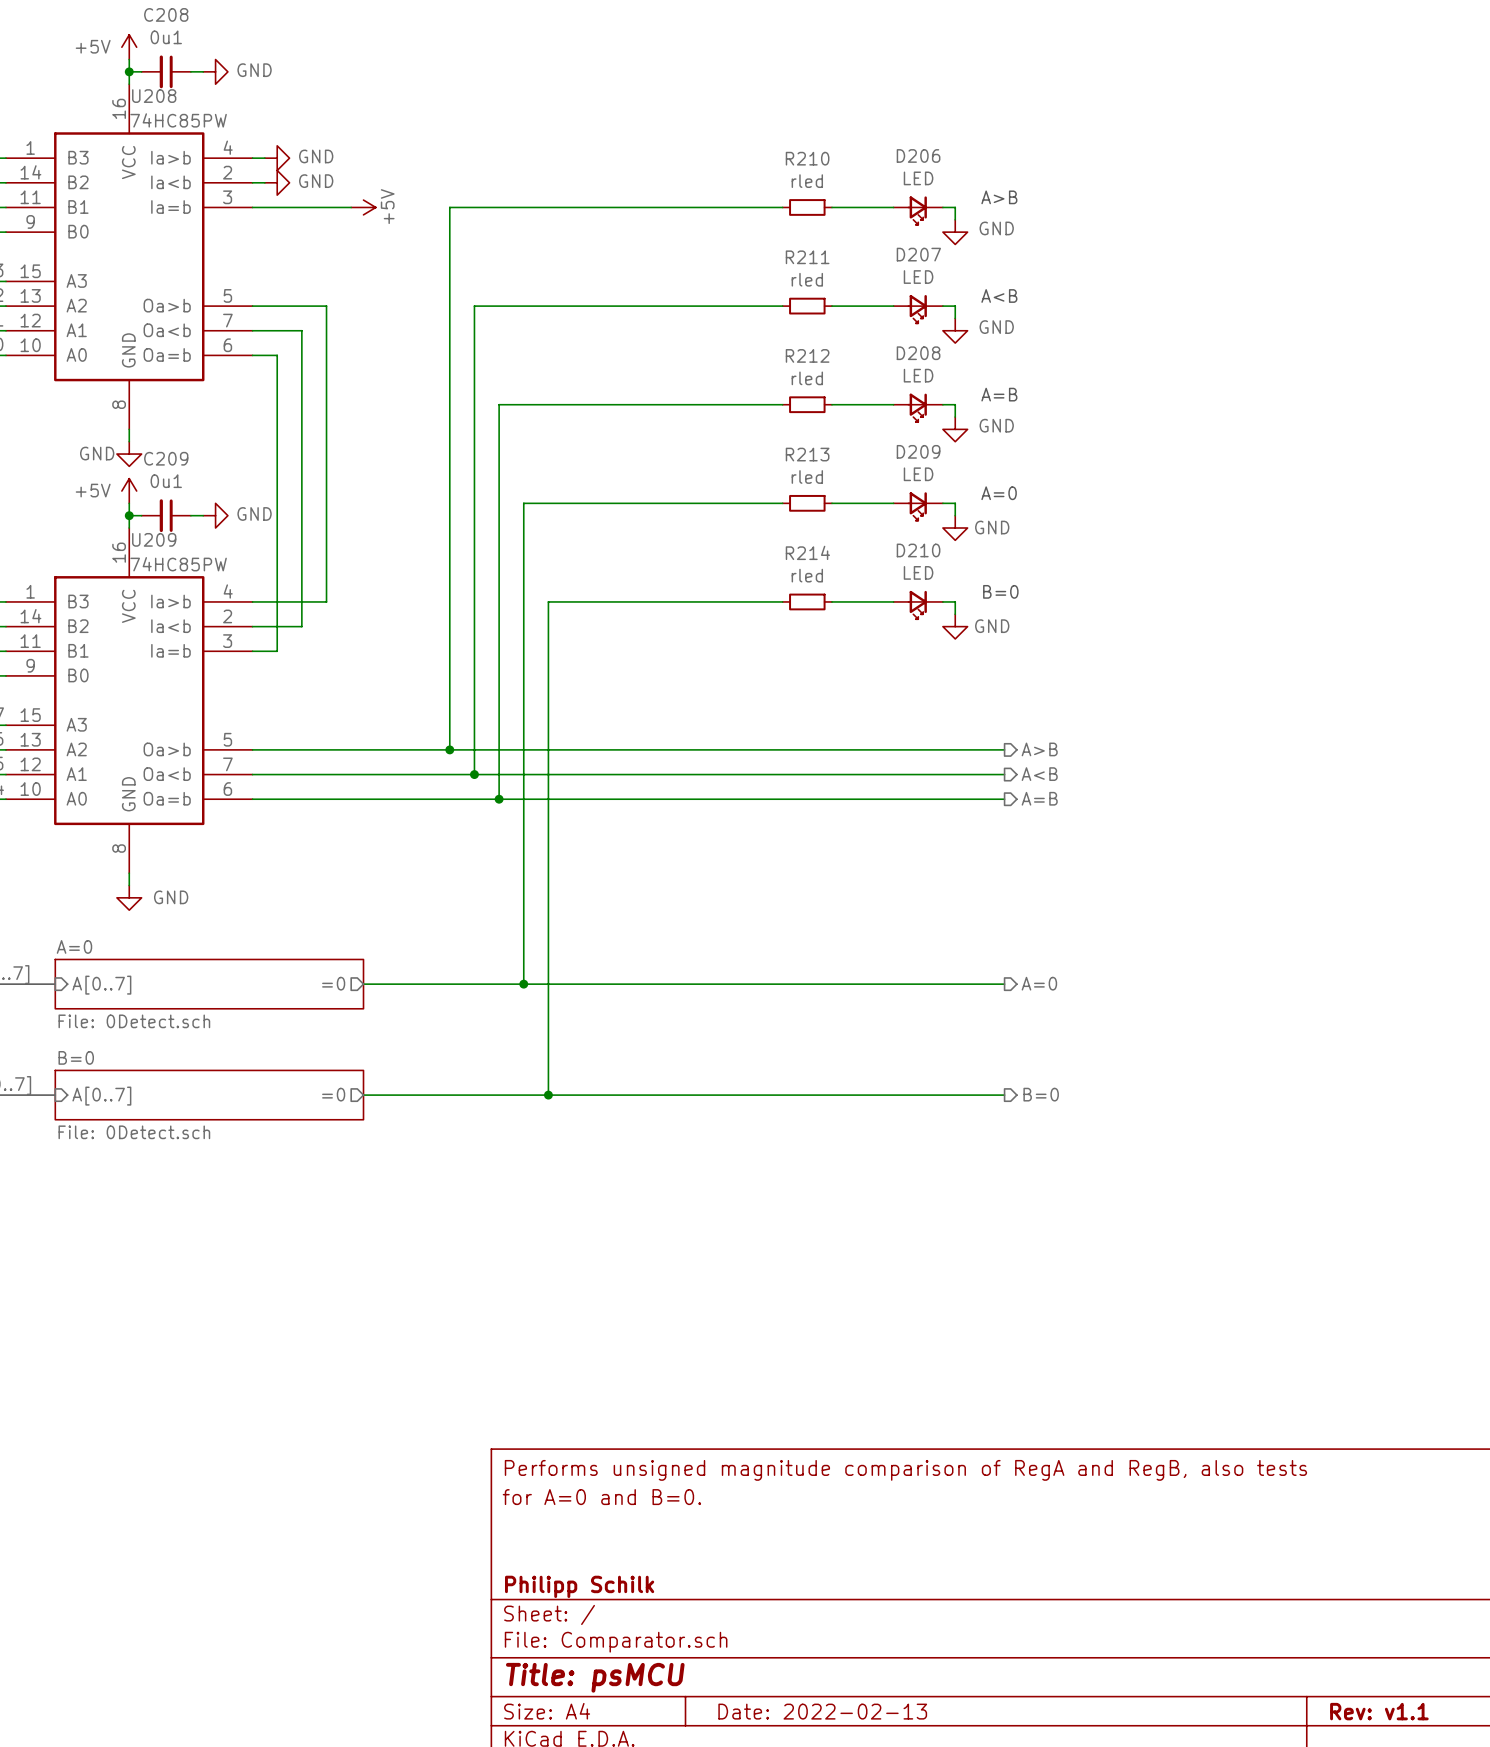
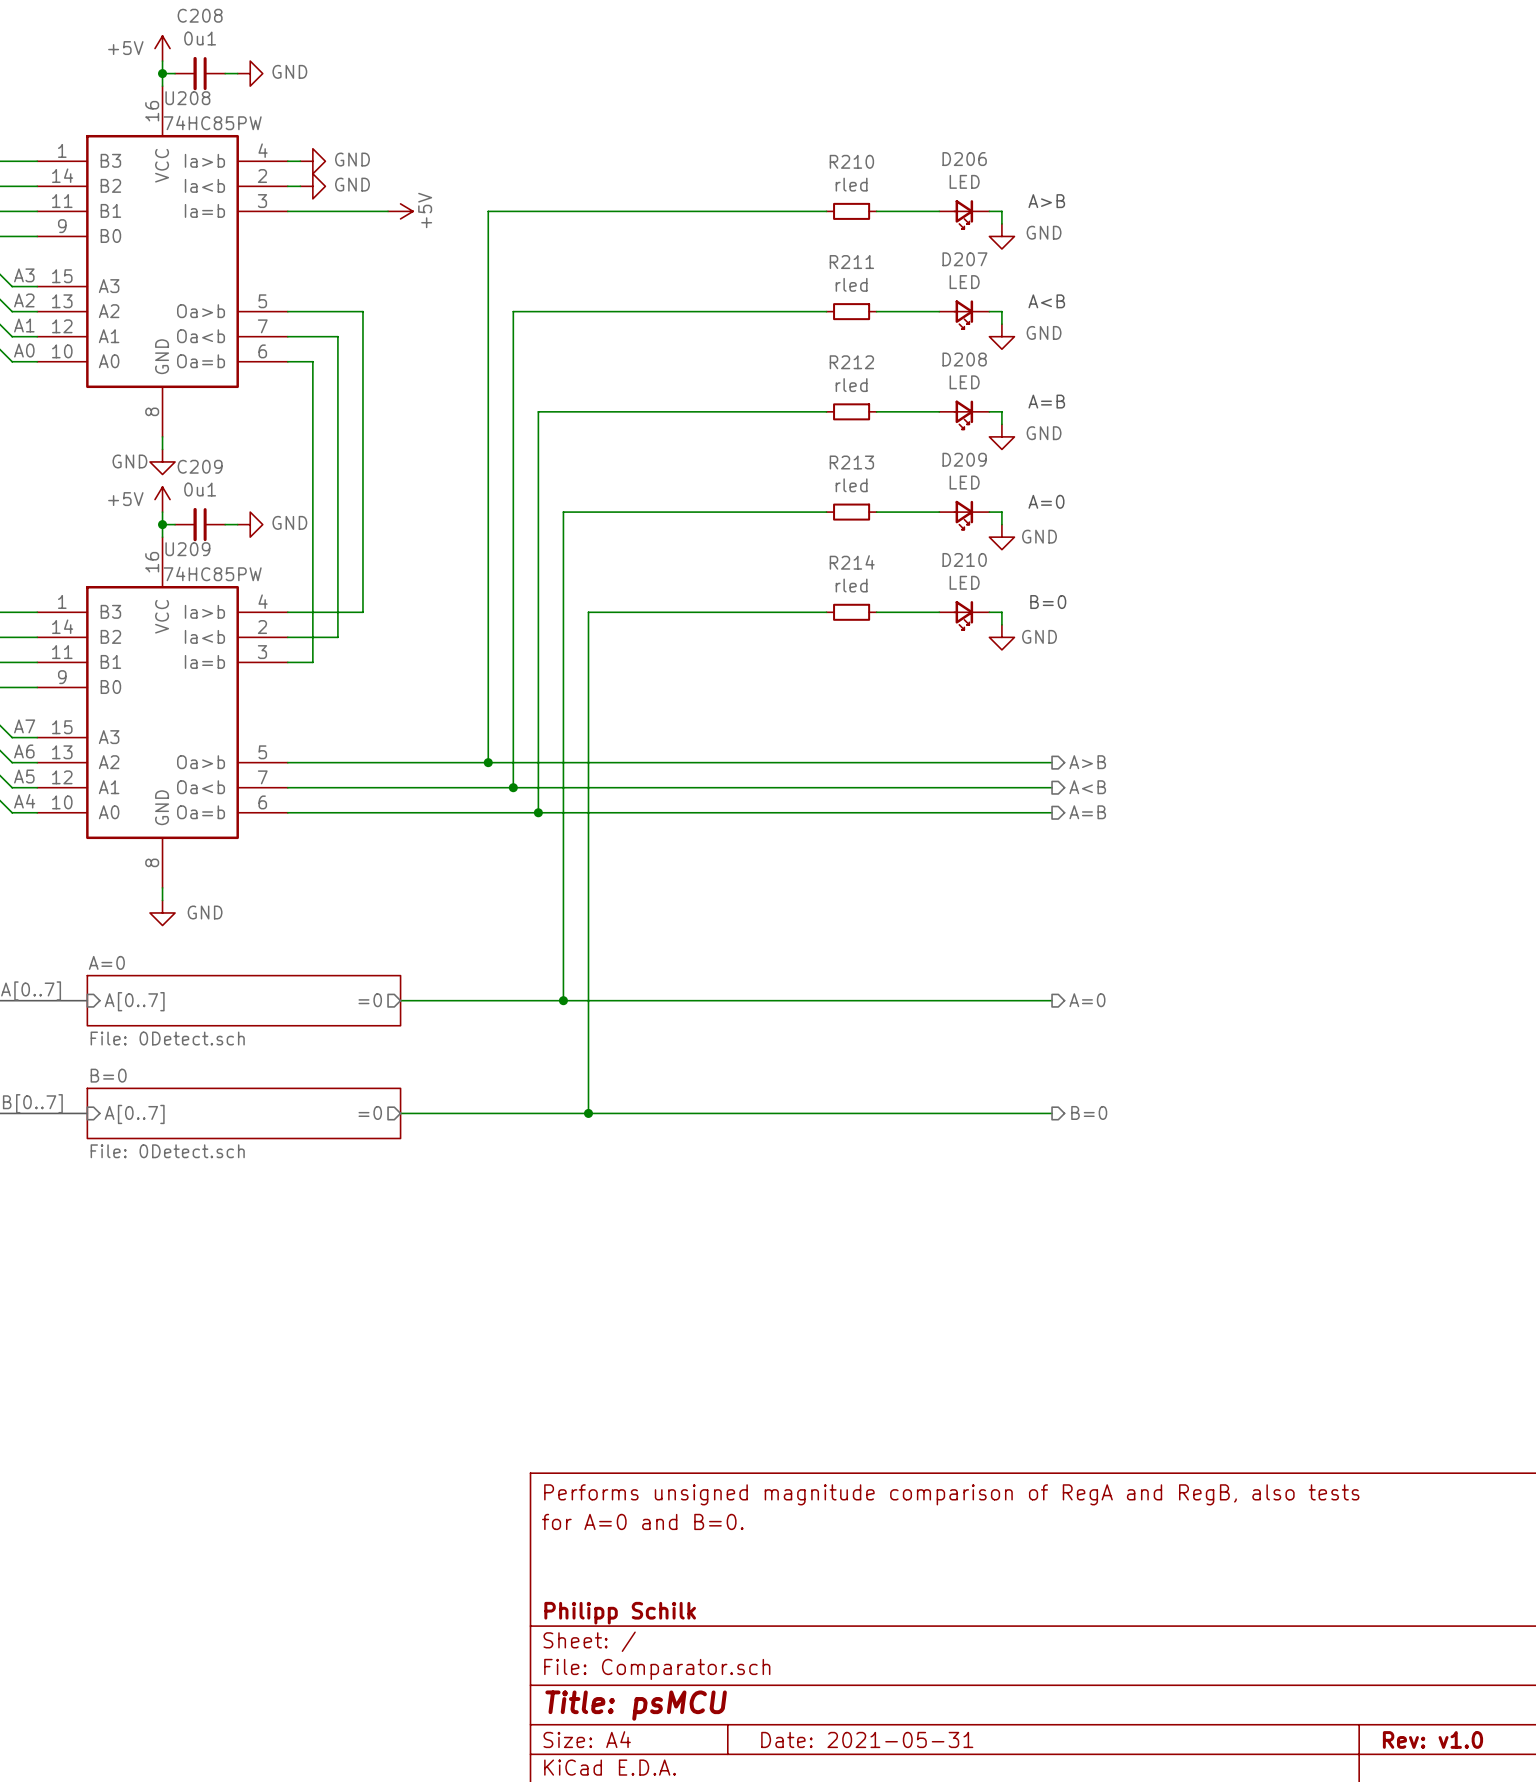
title block: Date: 2022-02-13 (822, 1711) -> Date: 2021-05-31 (867, 1739)
title block: Rev: v1.1 (1379, 1711) -> Rev: v1.0 (1432, 1739)

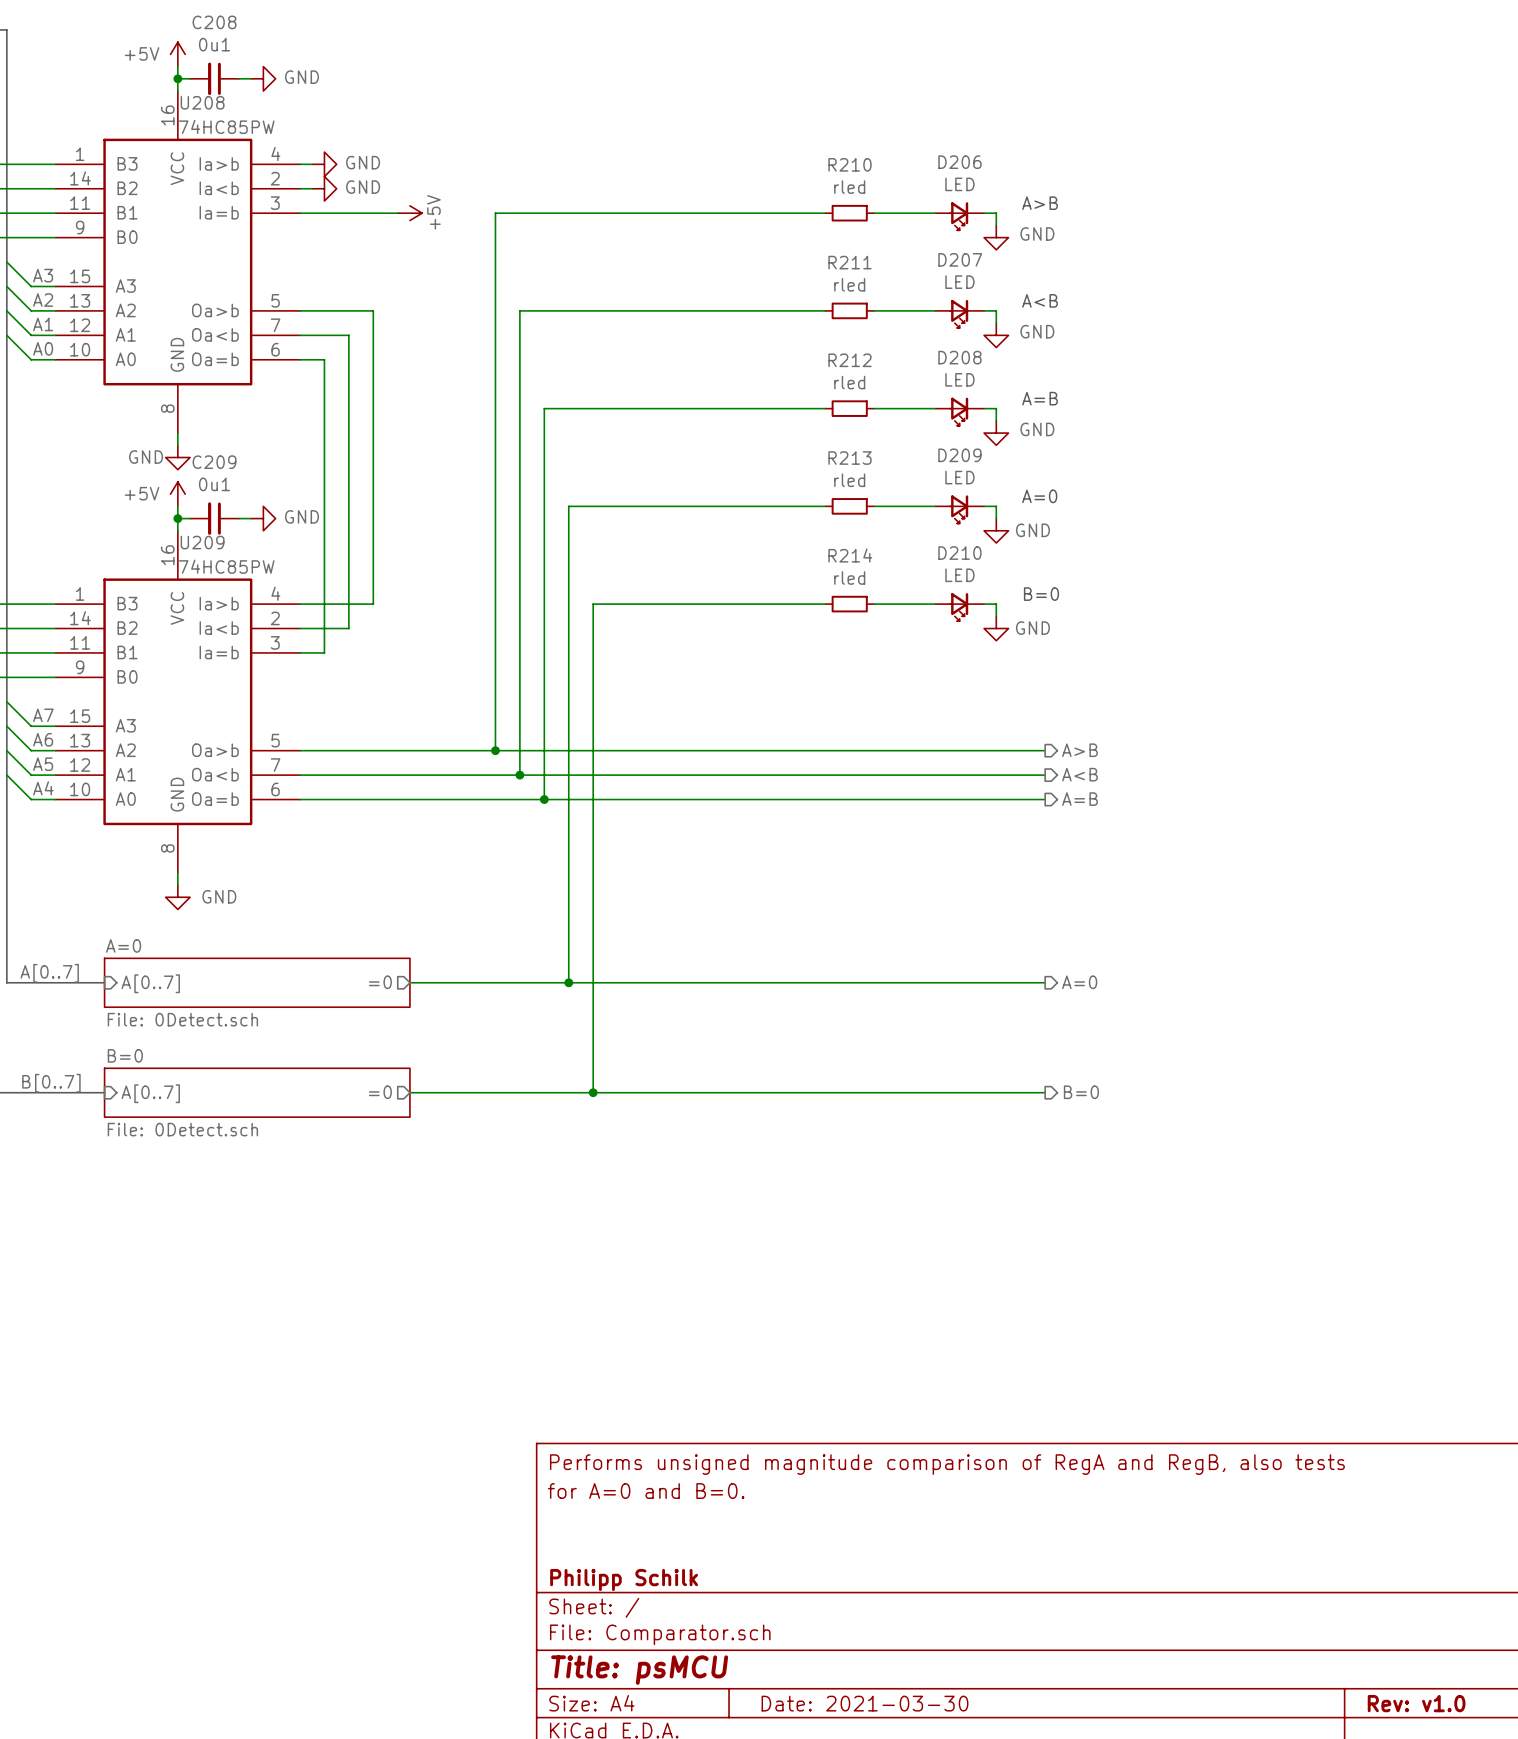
title block: Date: 2021-05-31 (867, 1739) -> Date: 2021-03-30 (864, 1703)

